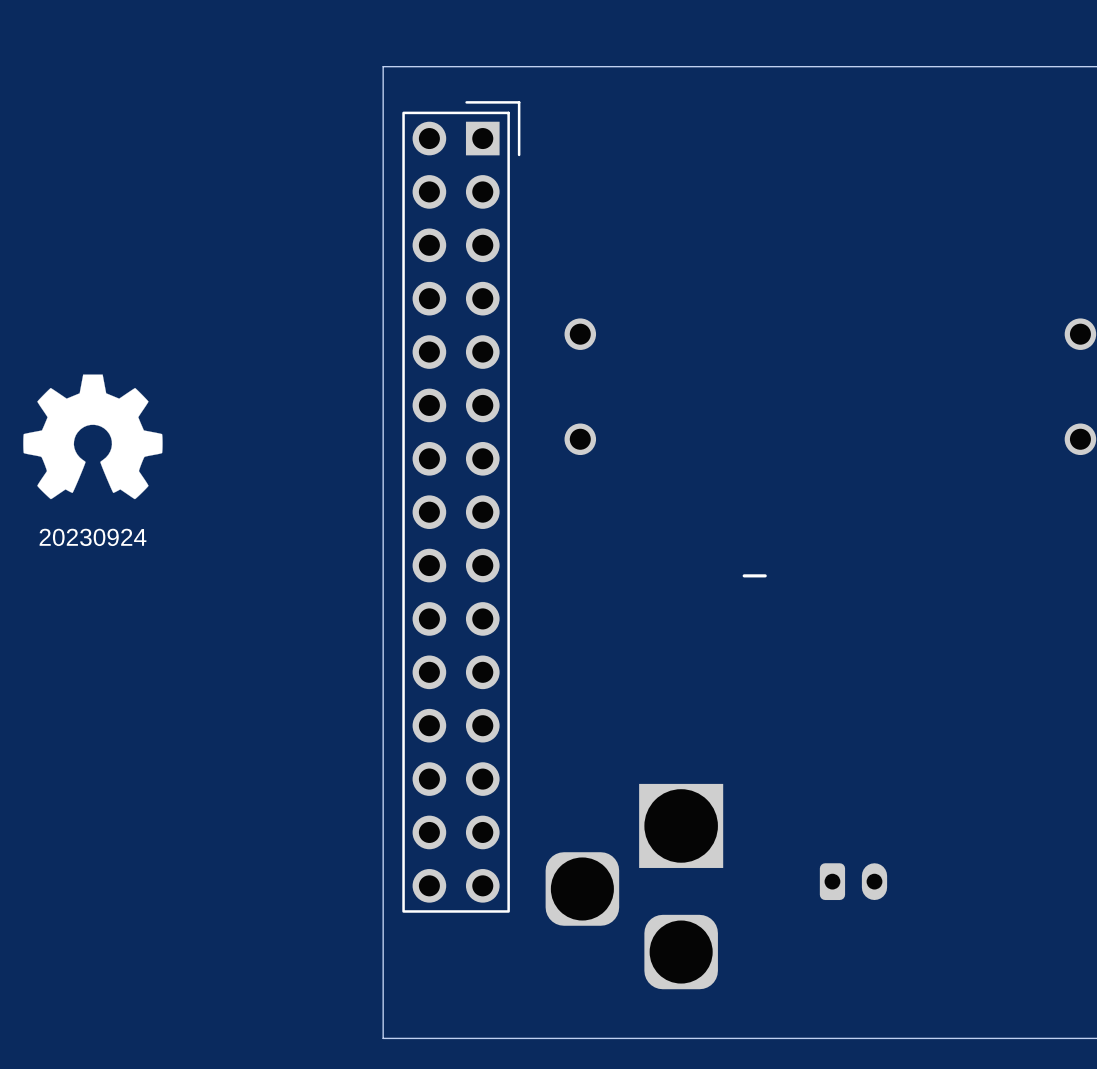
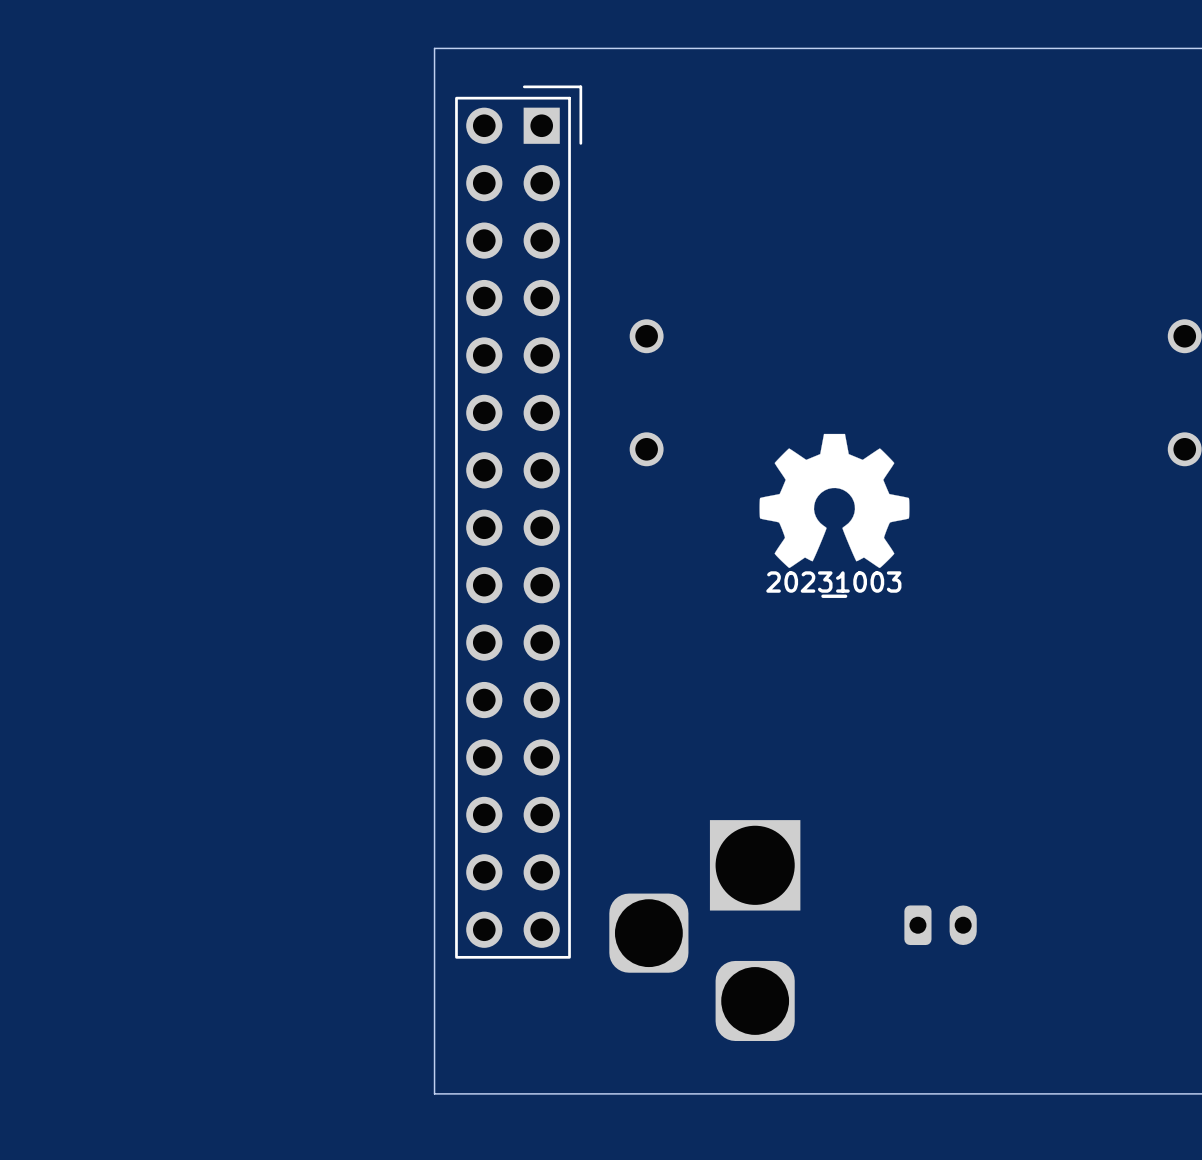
drawing: [23, 374, 163, 500] -> none
drawing: none -> [759, 433, 910, 569]
drawing shape: [39, 528, 767, 578] -> [766, 571, 902, 598]

